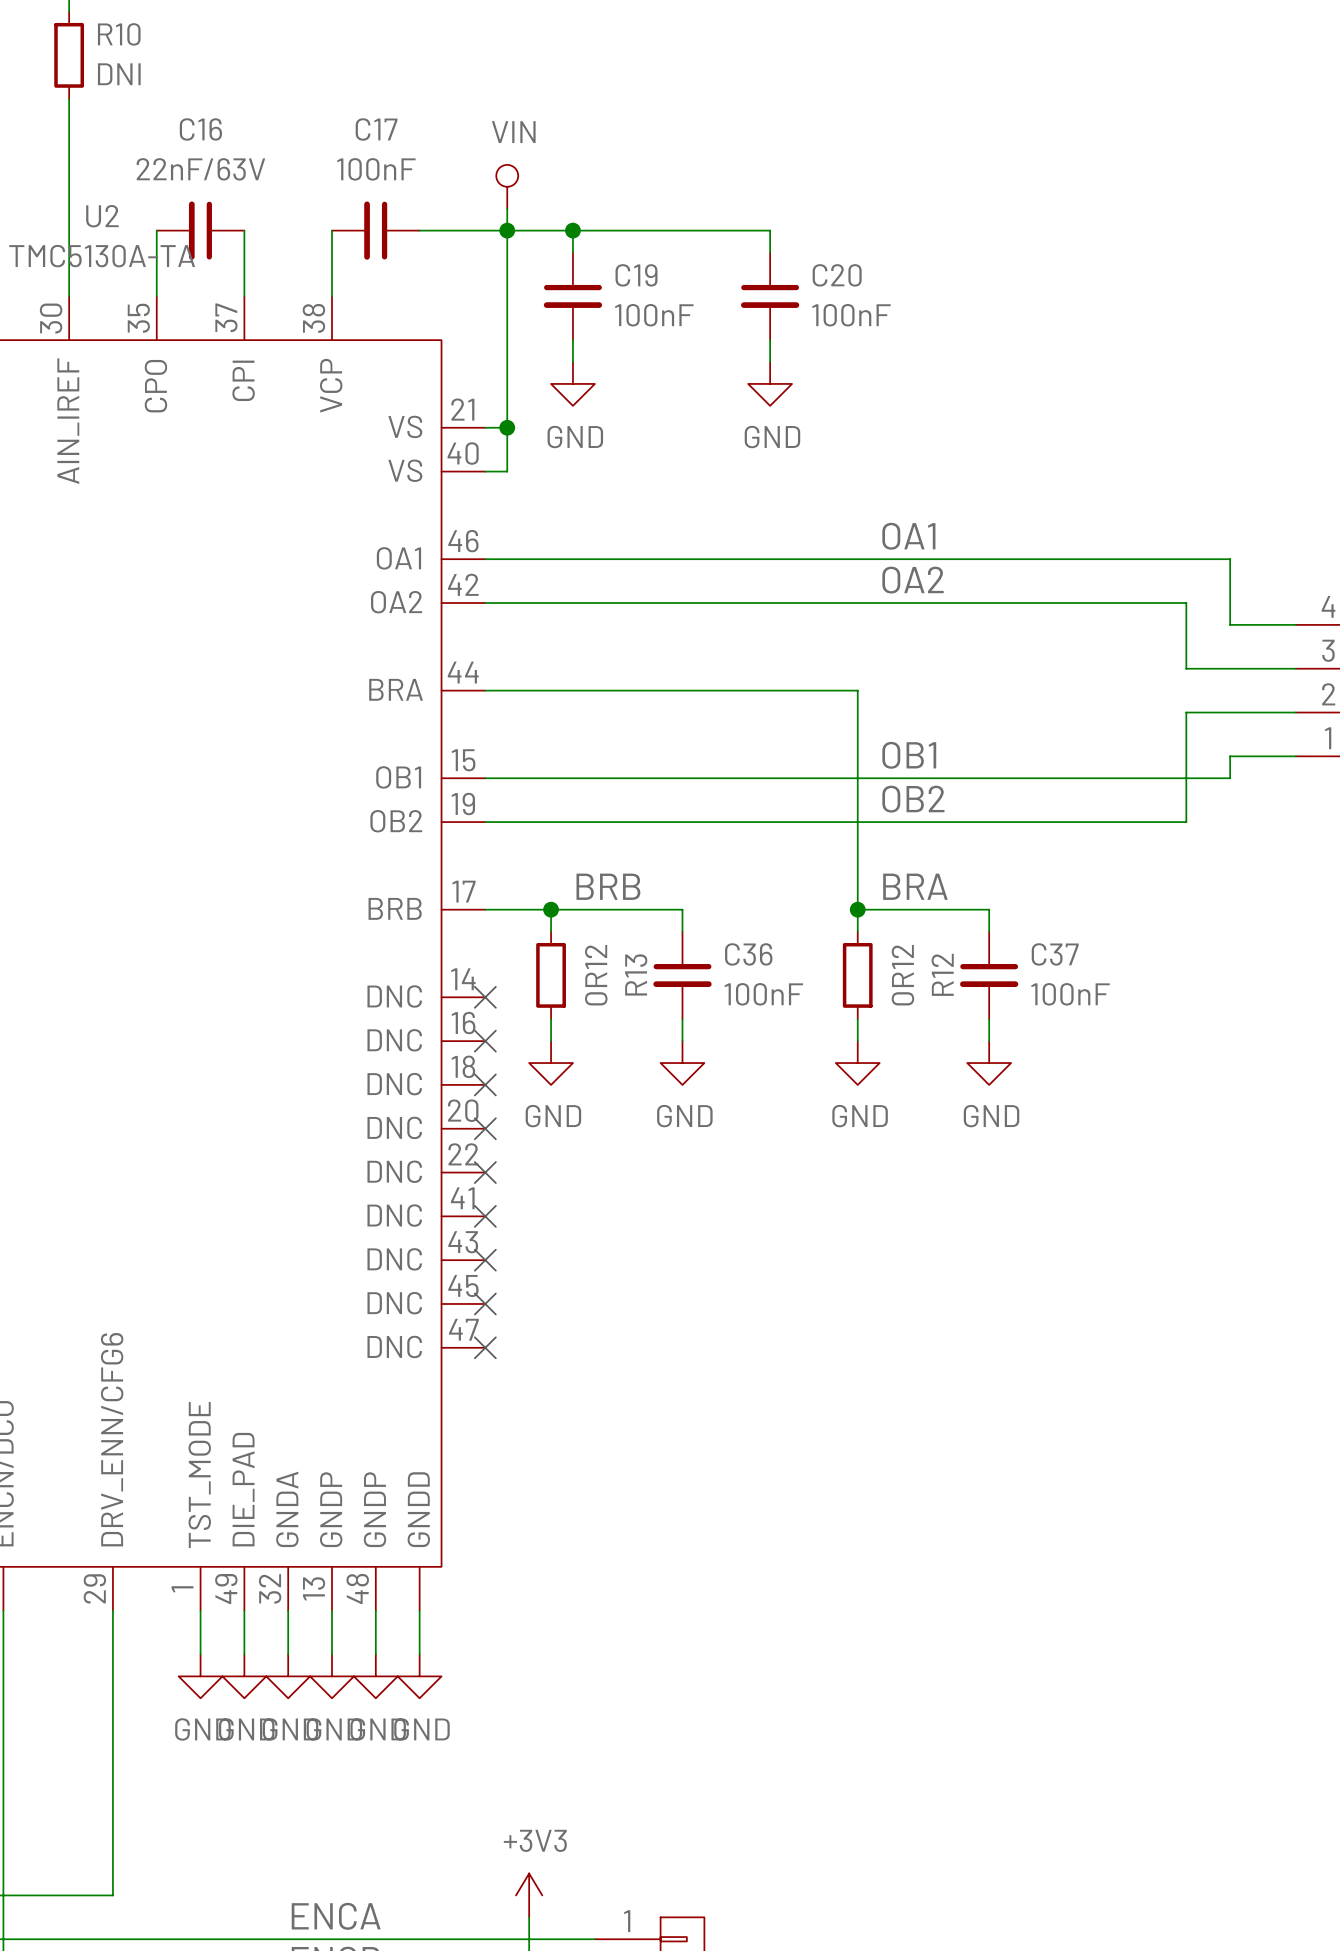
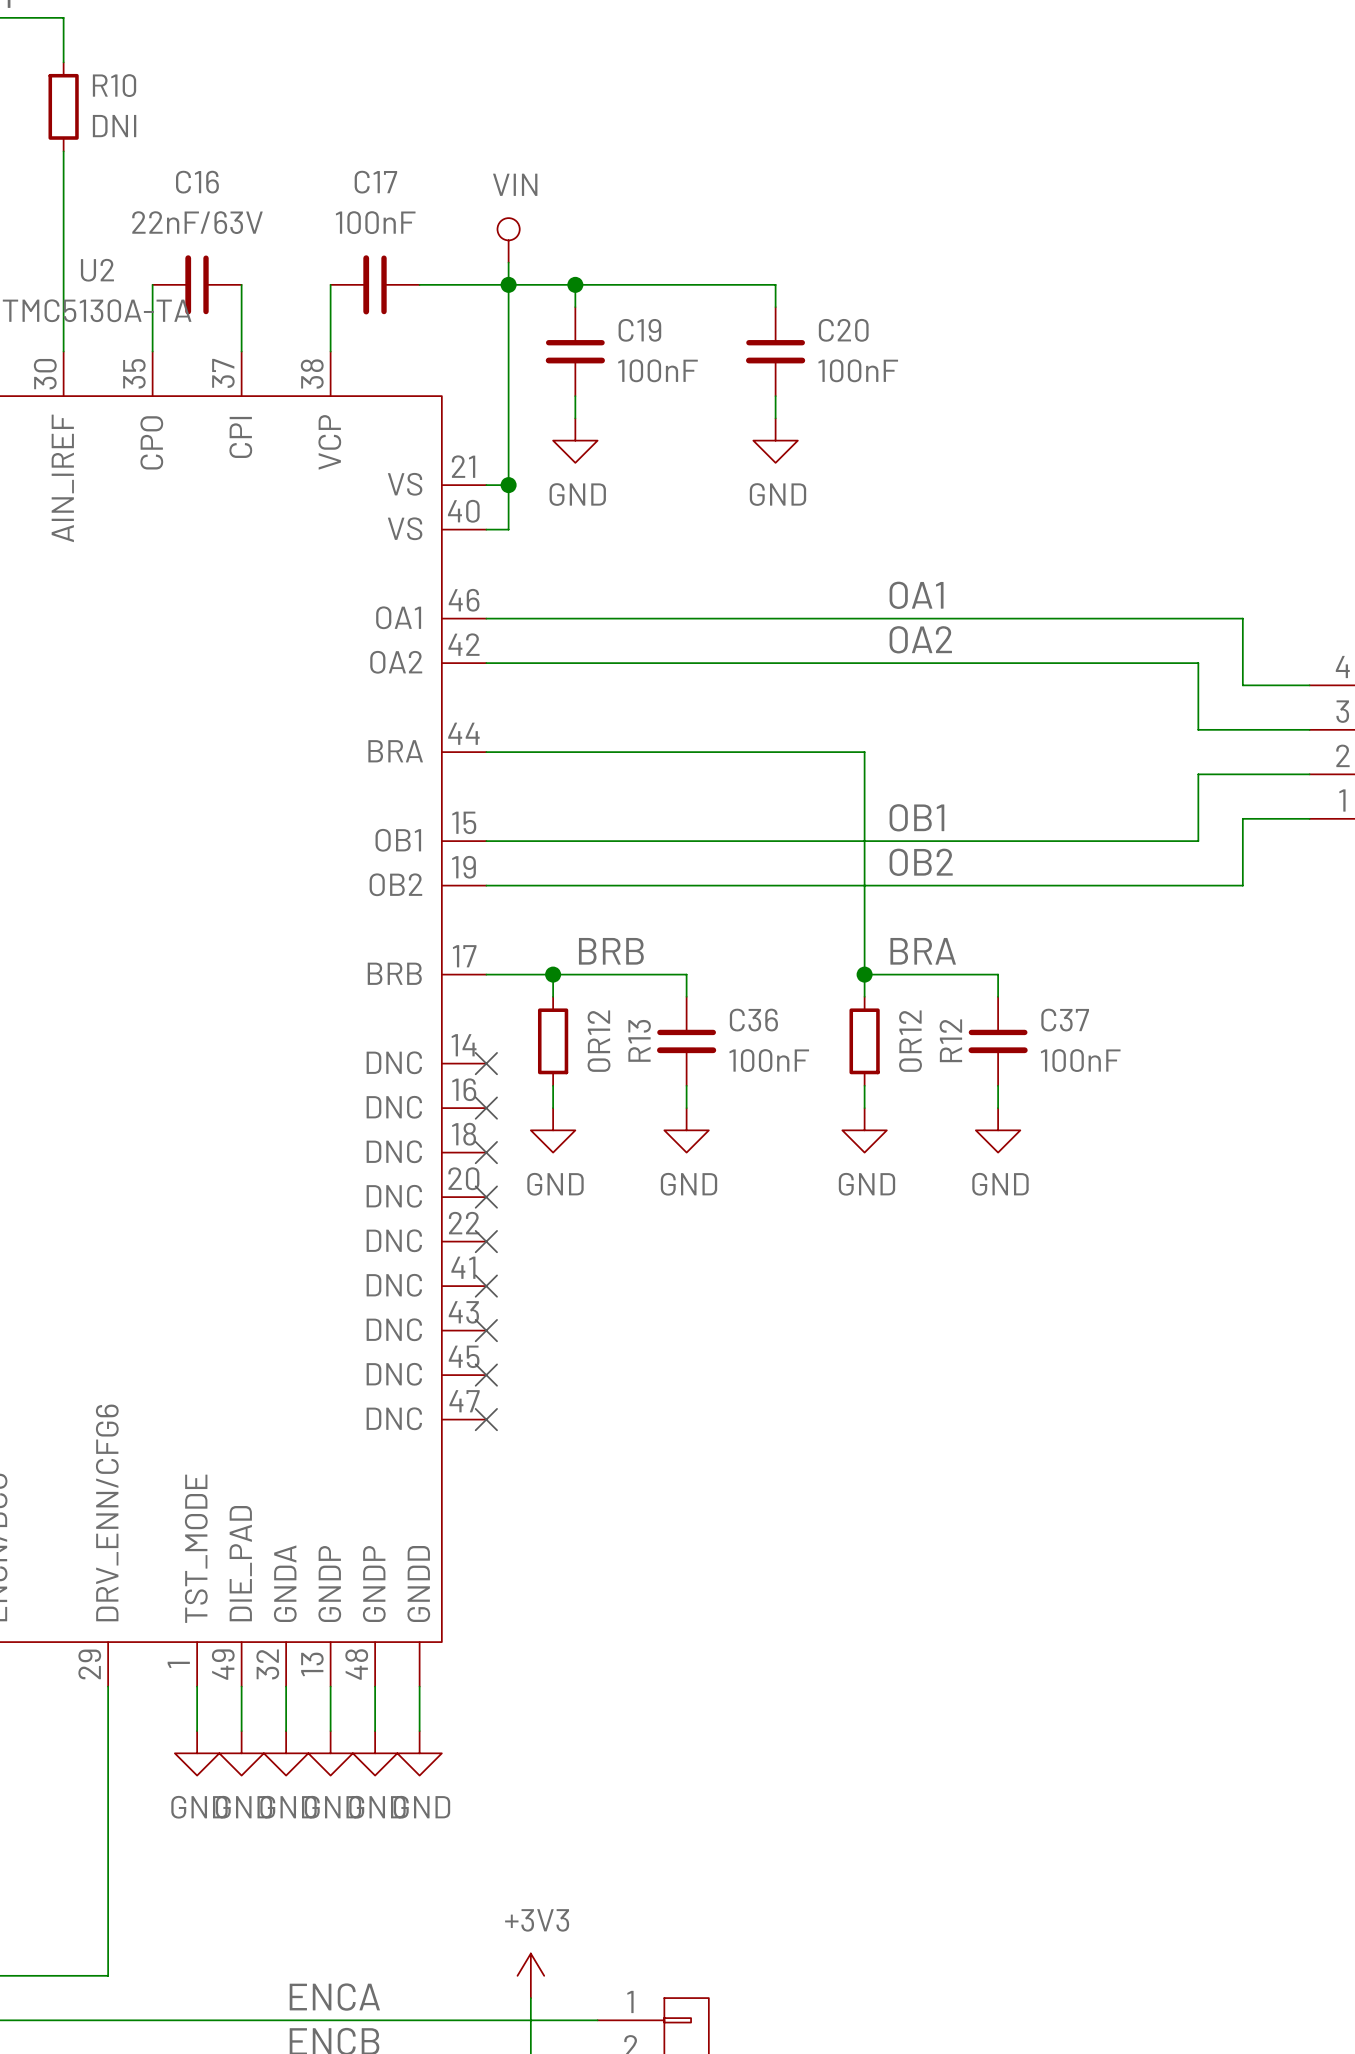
wire: (1230, 778) (1186, 778) (1186, 822) -> (1242, 841) (1242, 885) (1198, 885)

